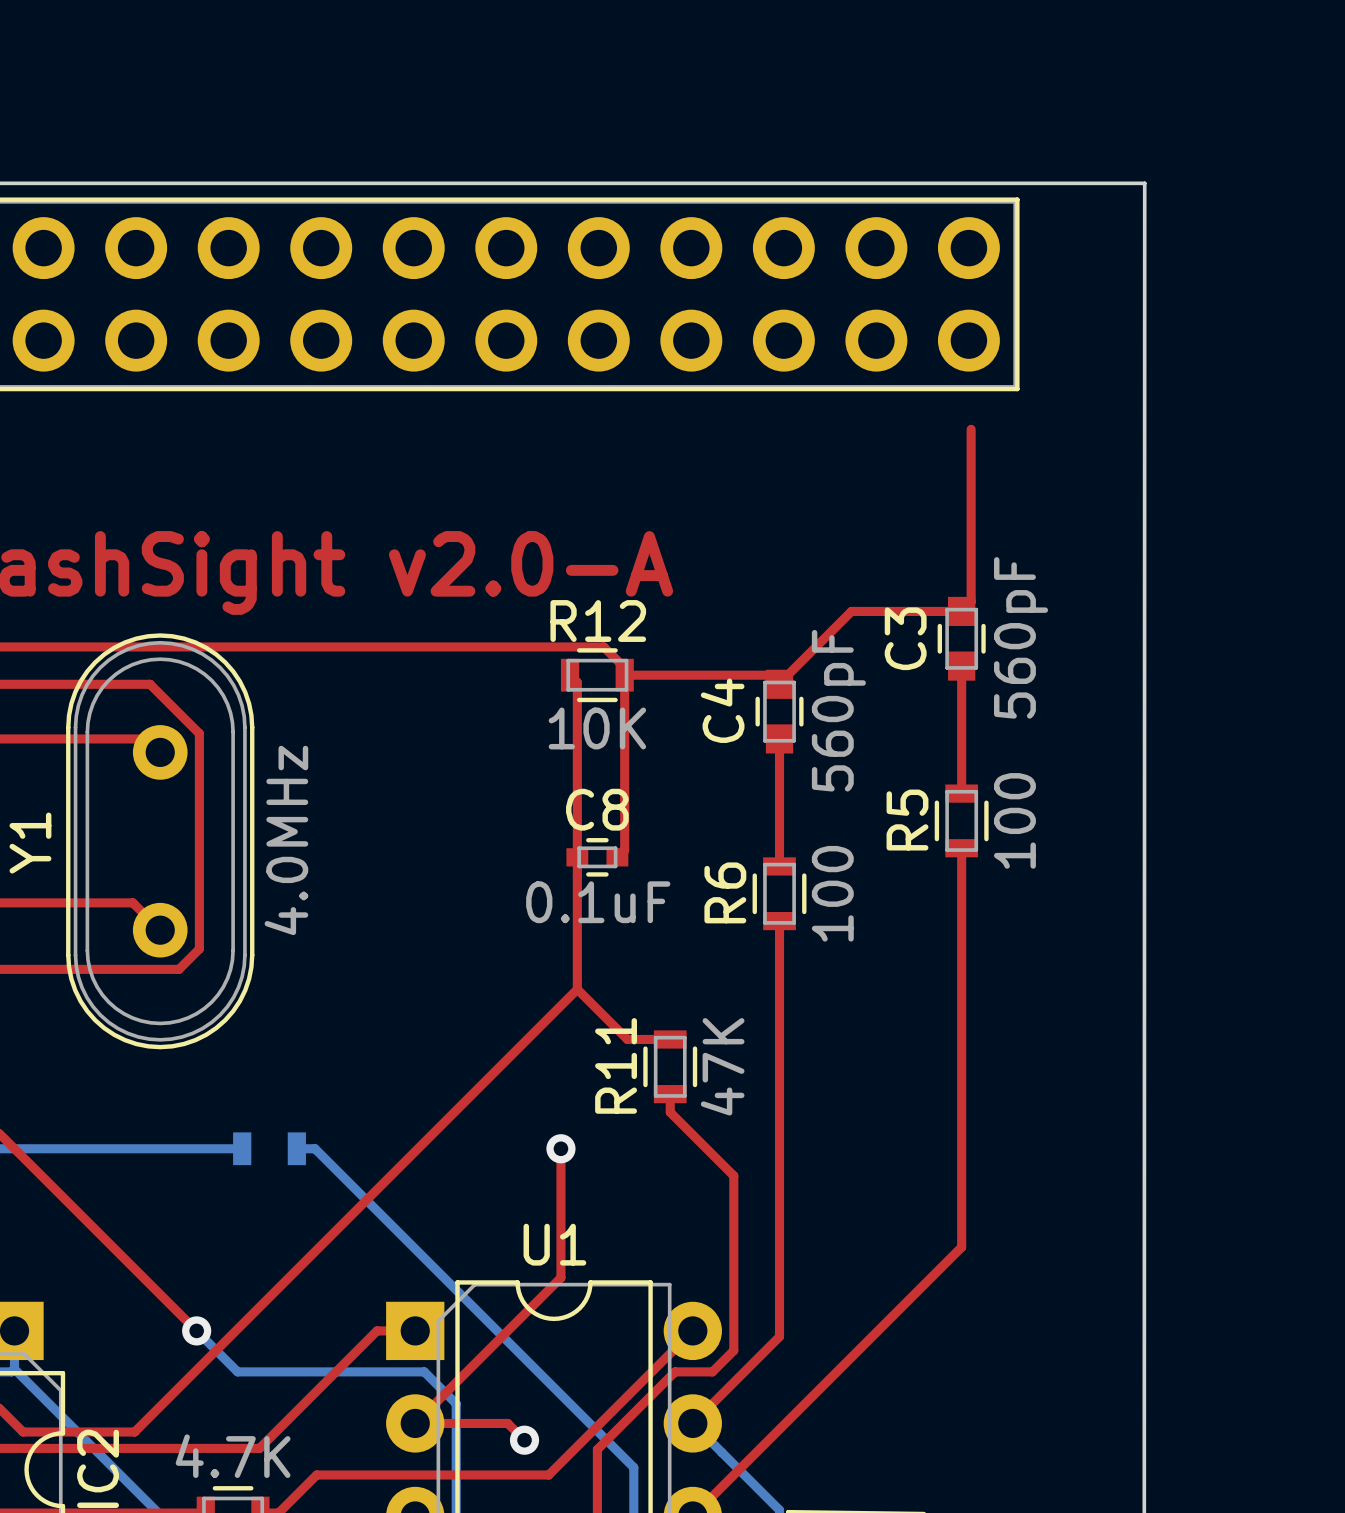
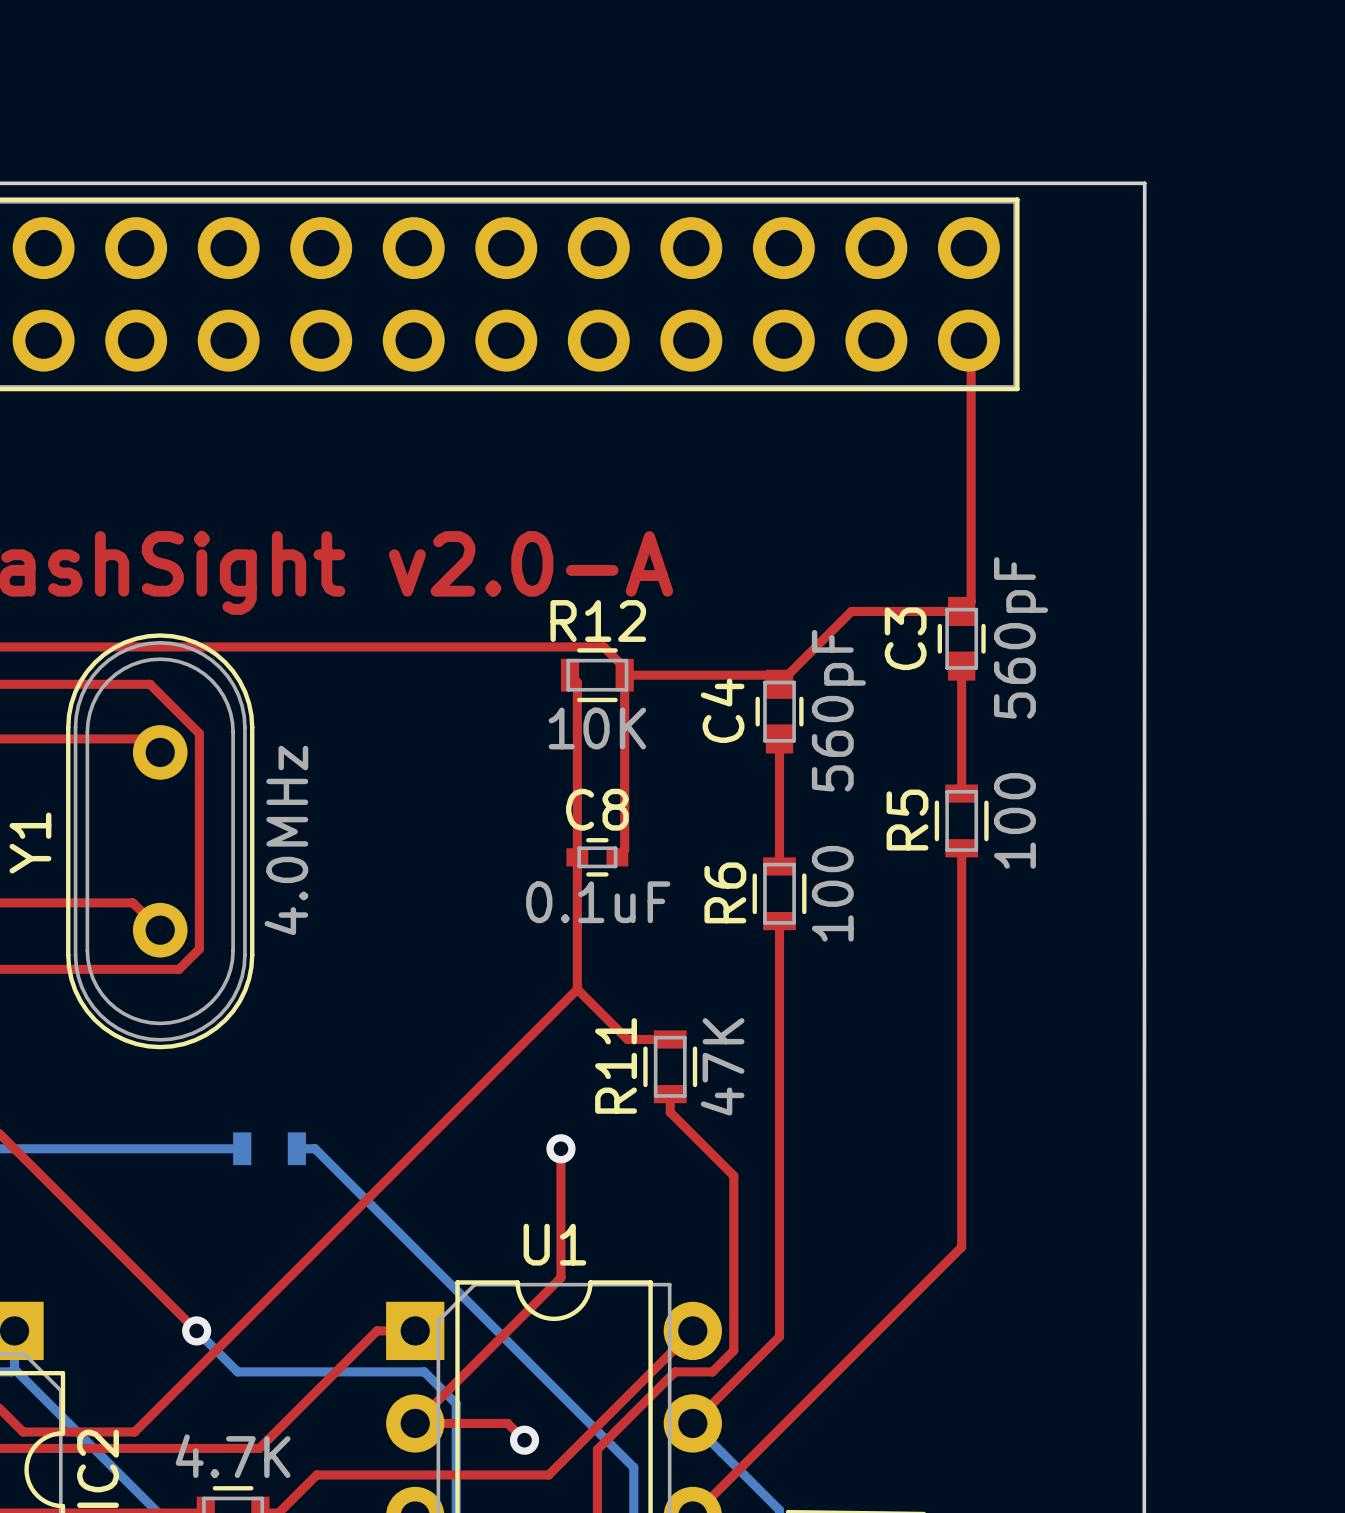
top track: none -> (968, 340) (971, 342) (971, 429)

